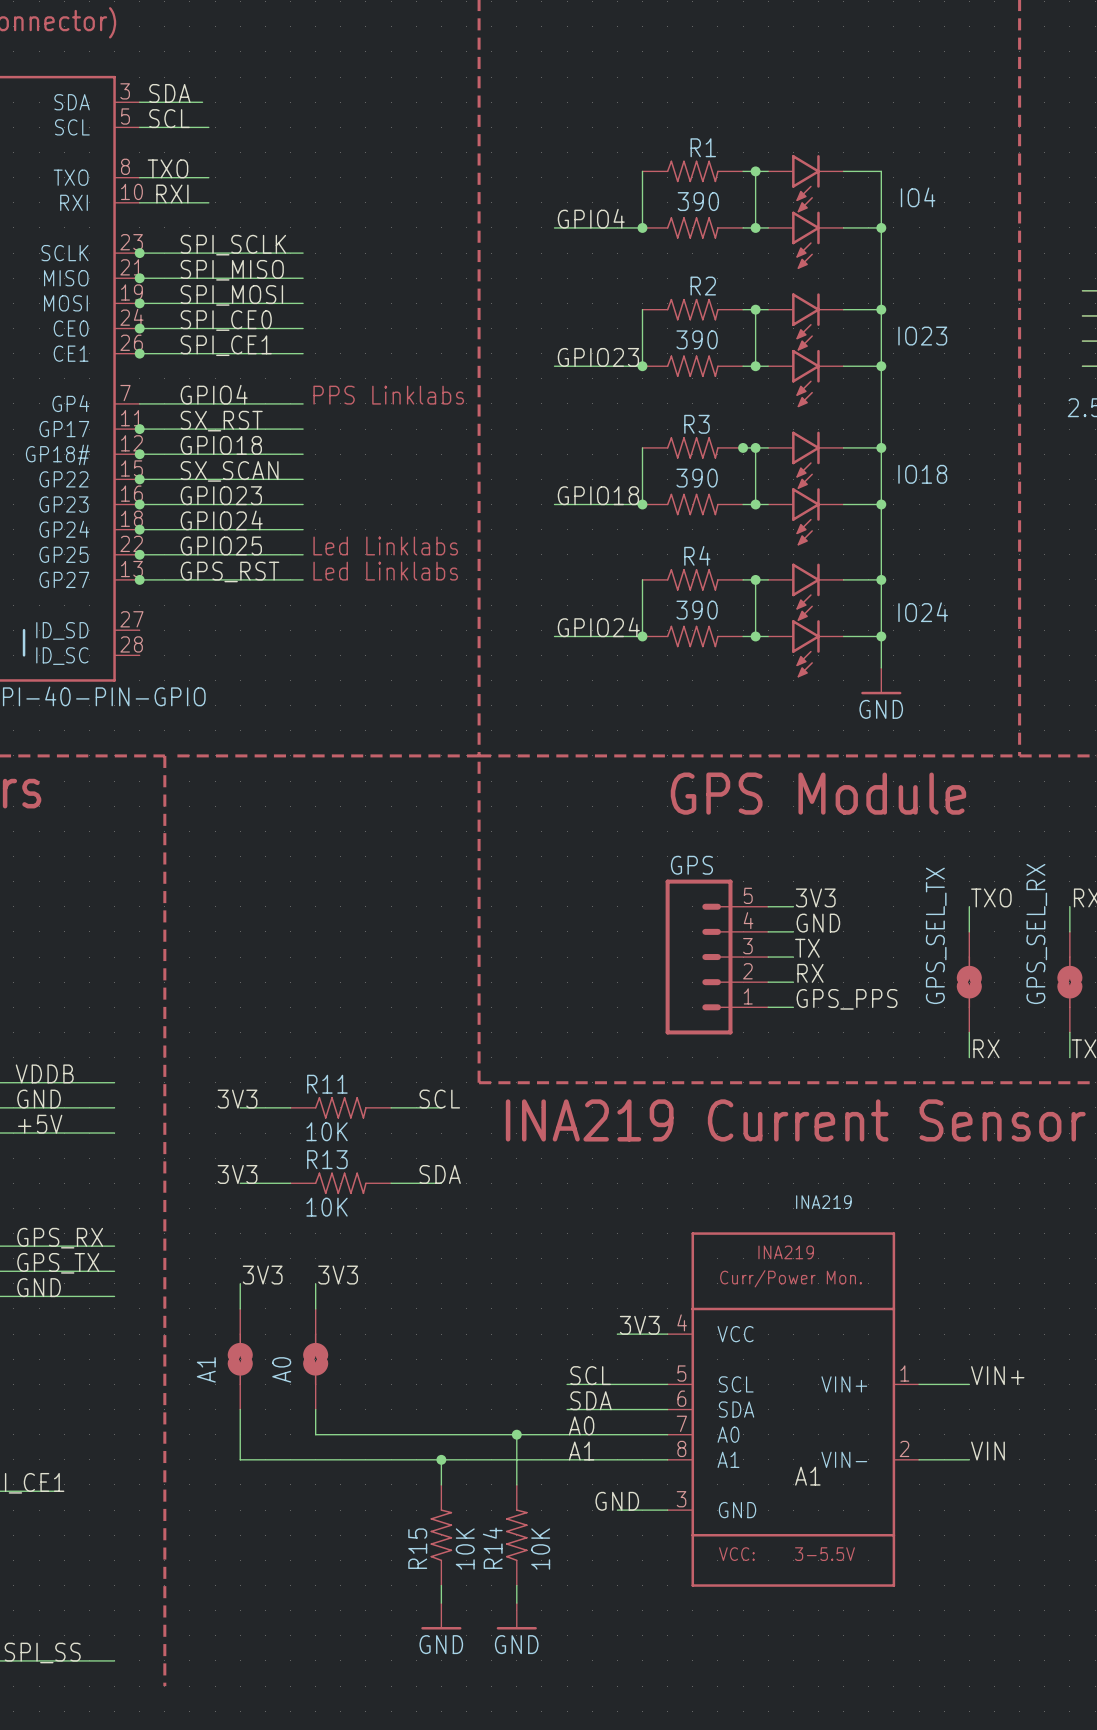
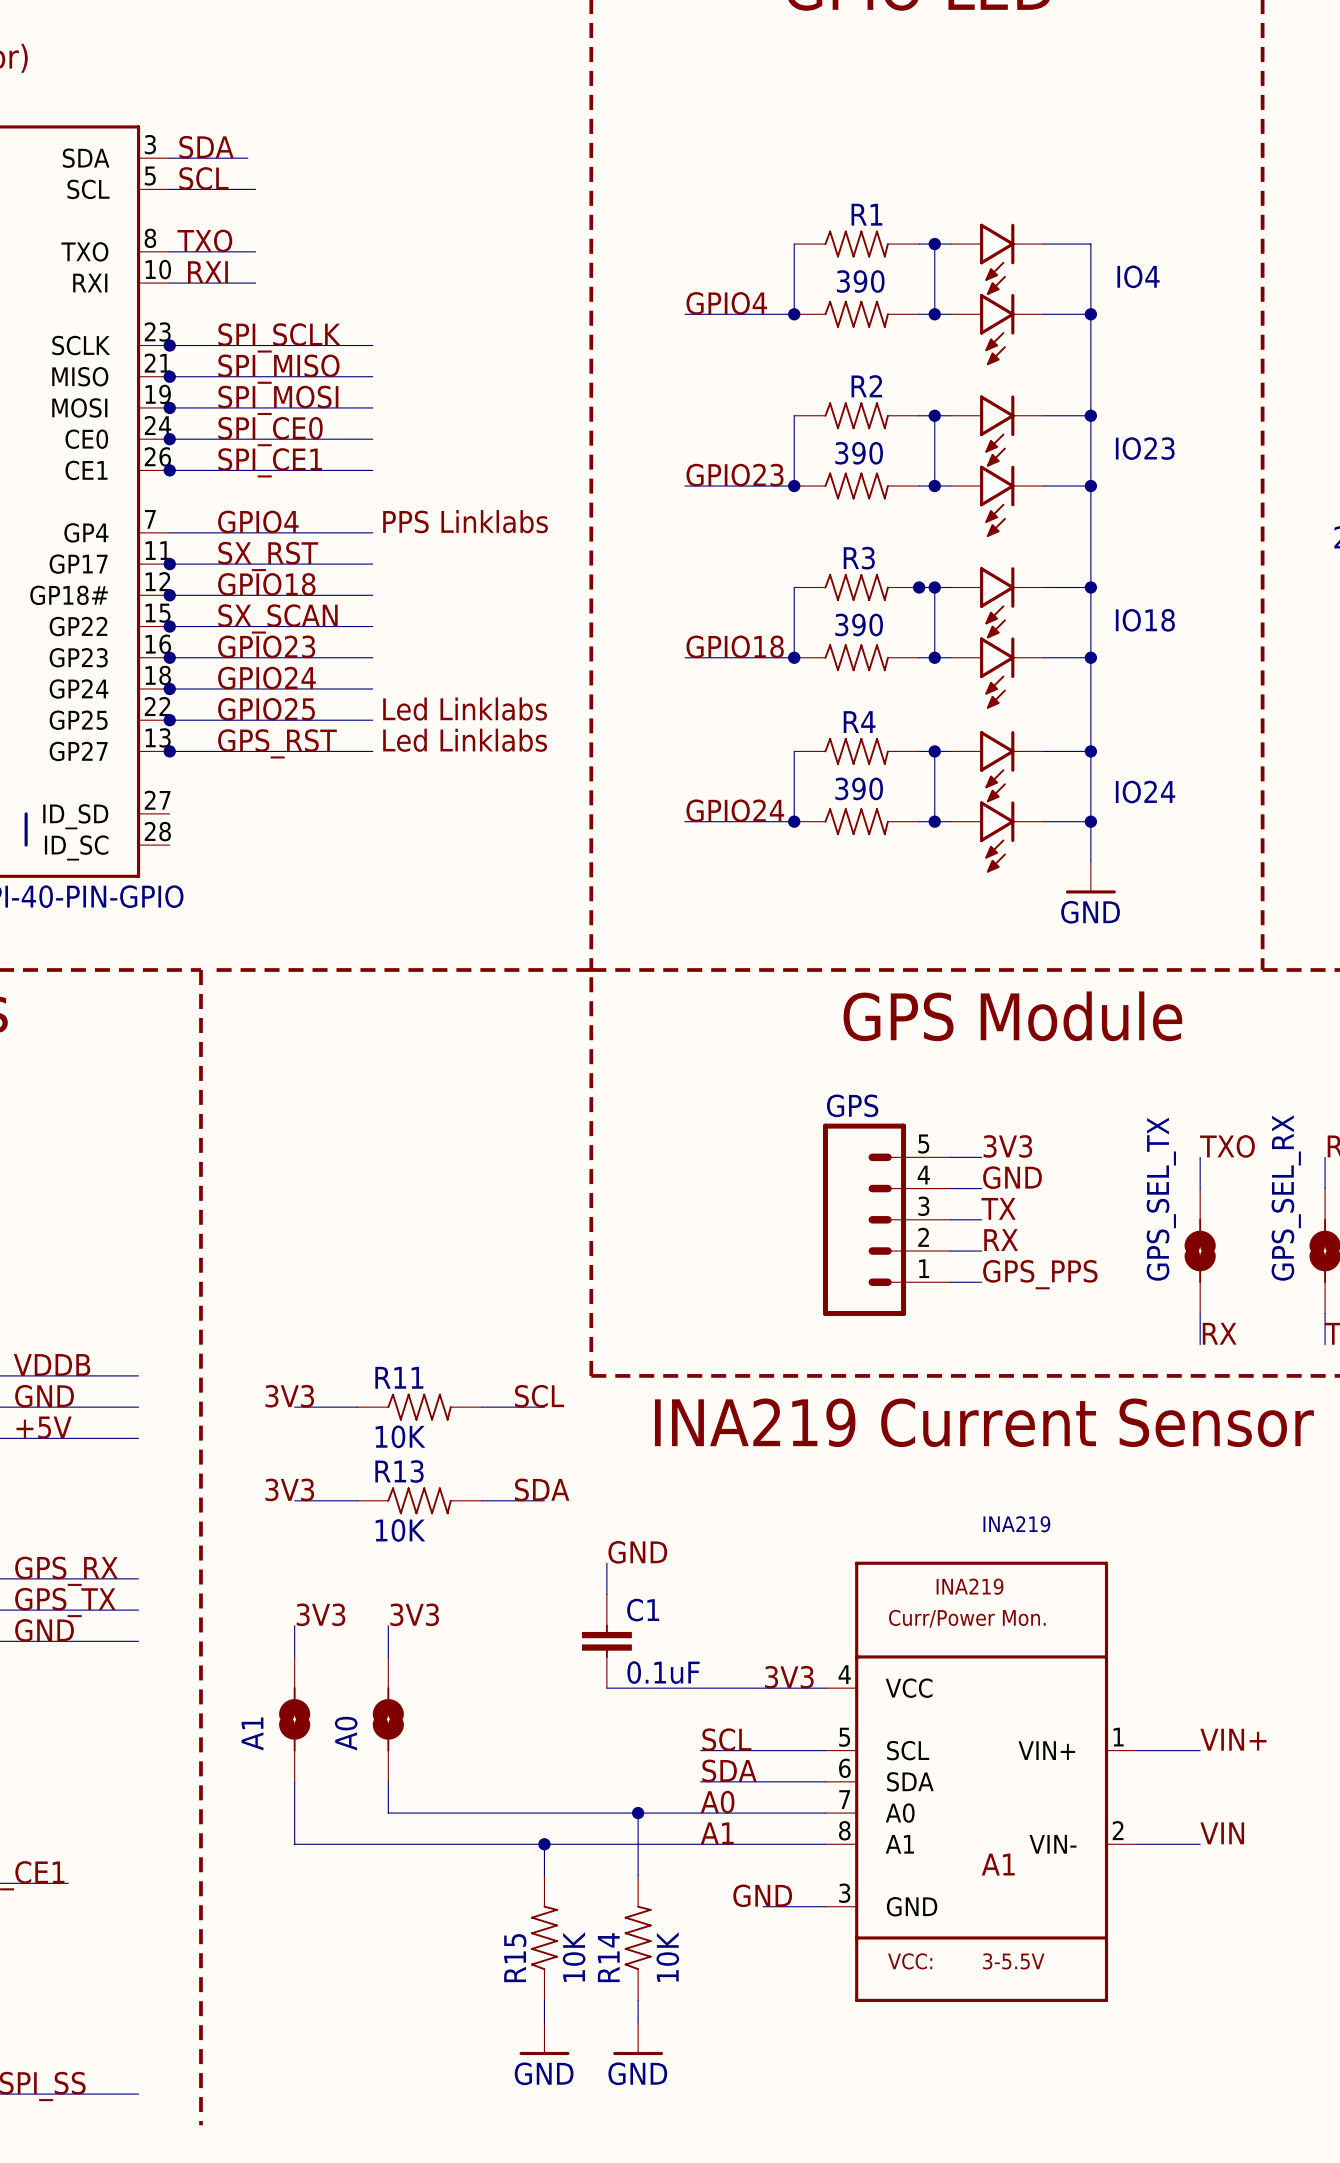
label: none -> GND (637, 1552)
wire: none -> (606, 1563) (606, 1594)
C1: none -> 0.1uF (606, 1641)
wire: none -> (606, 1688) (763, 1688)

